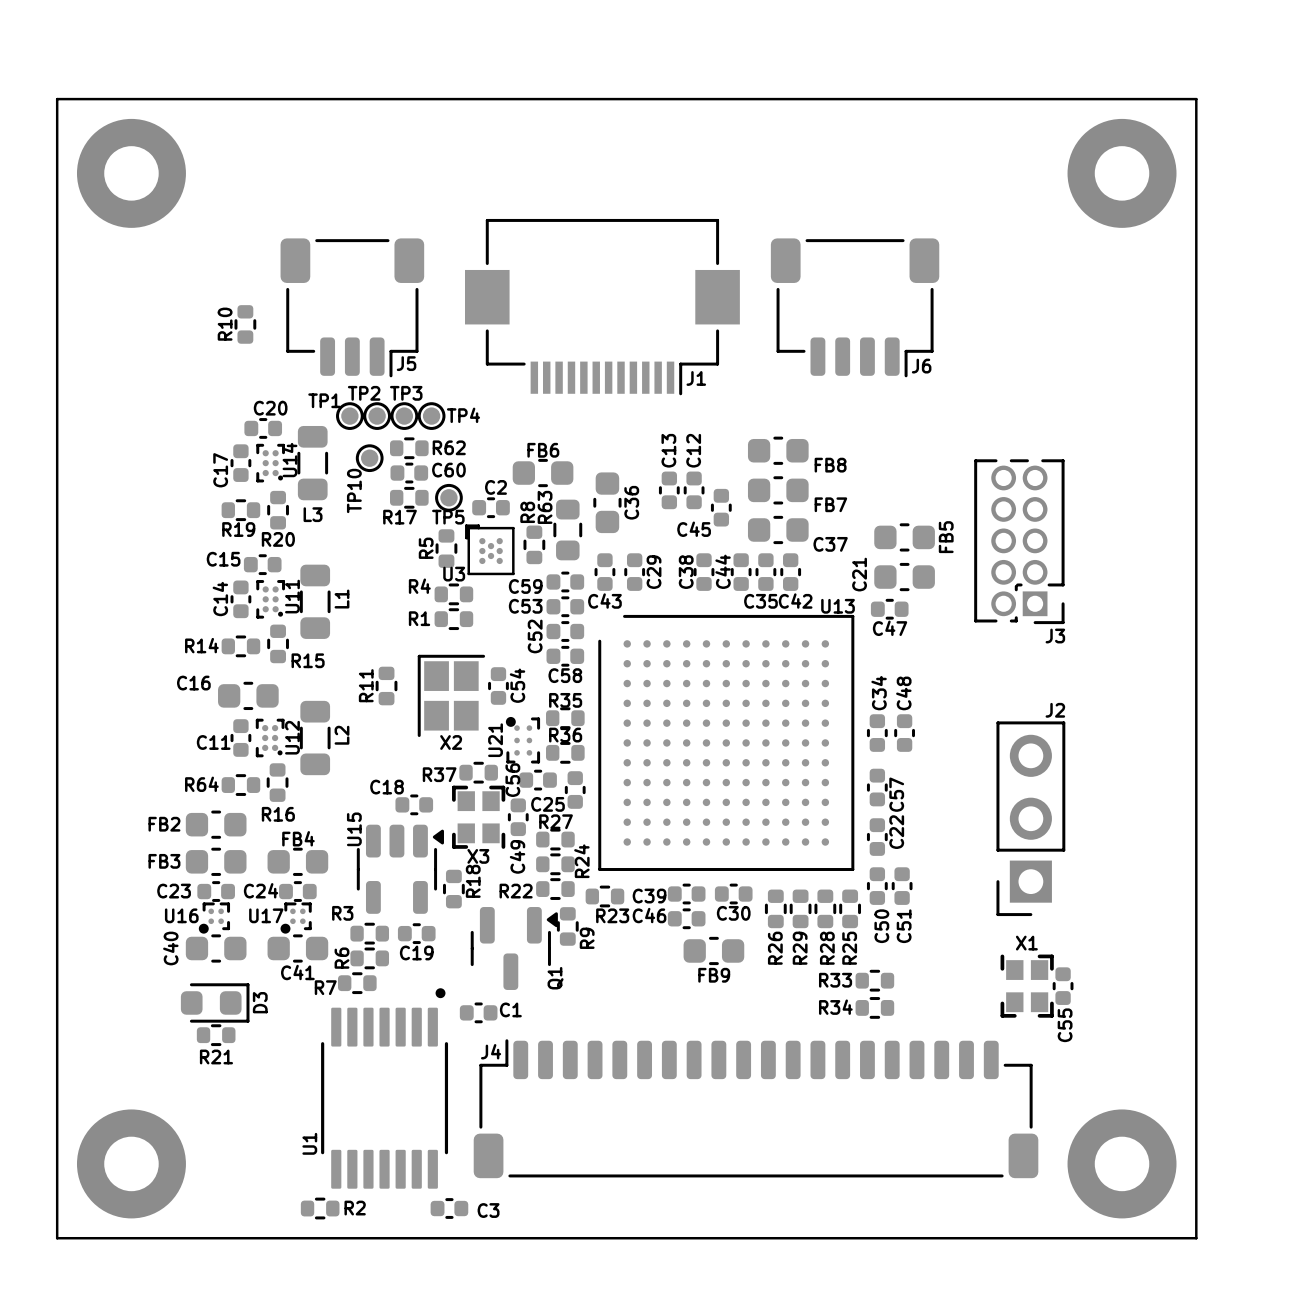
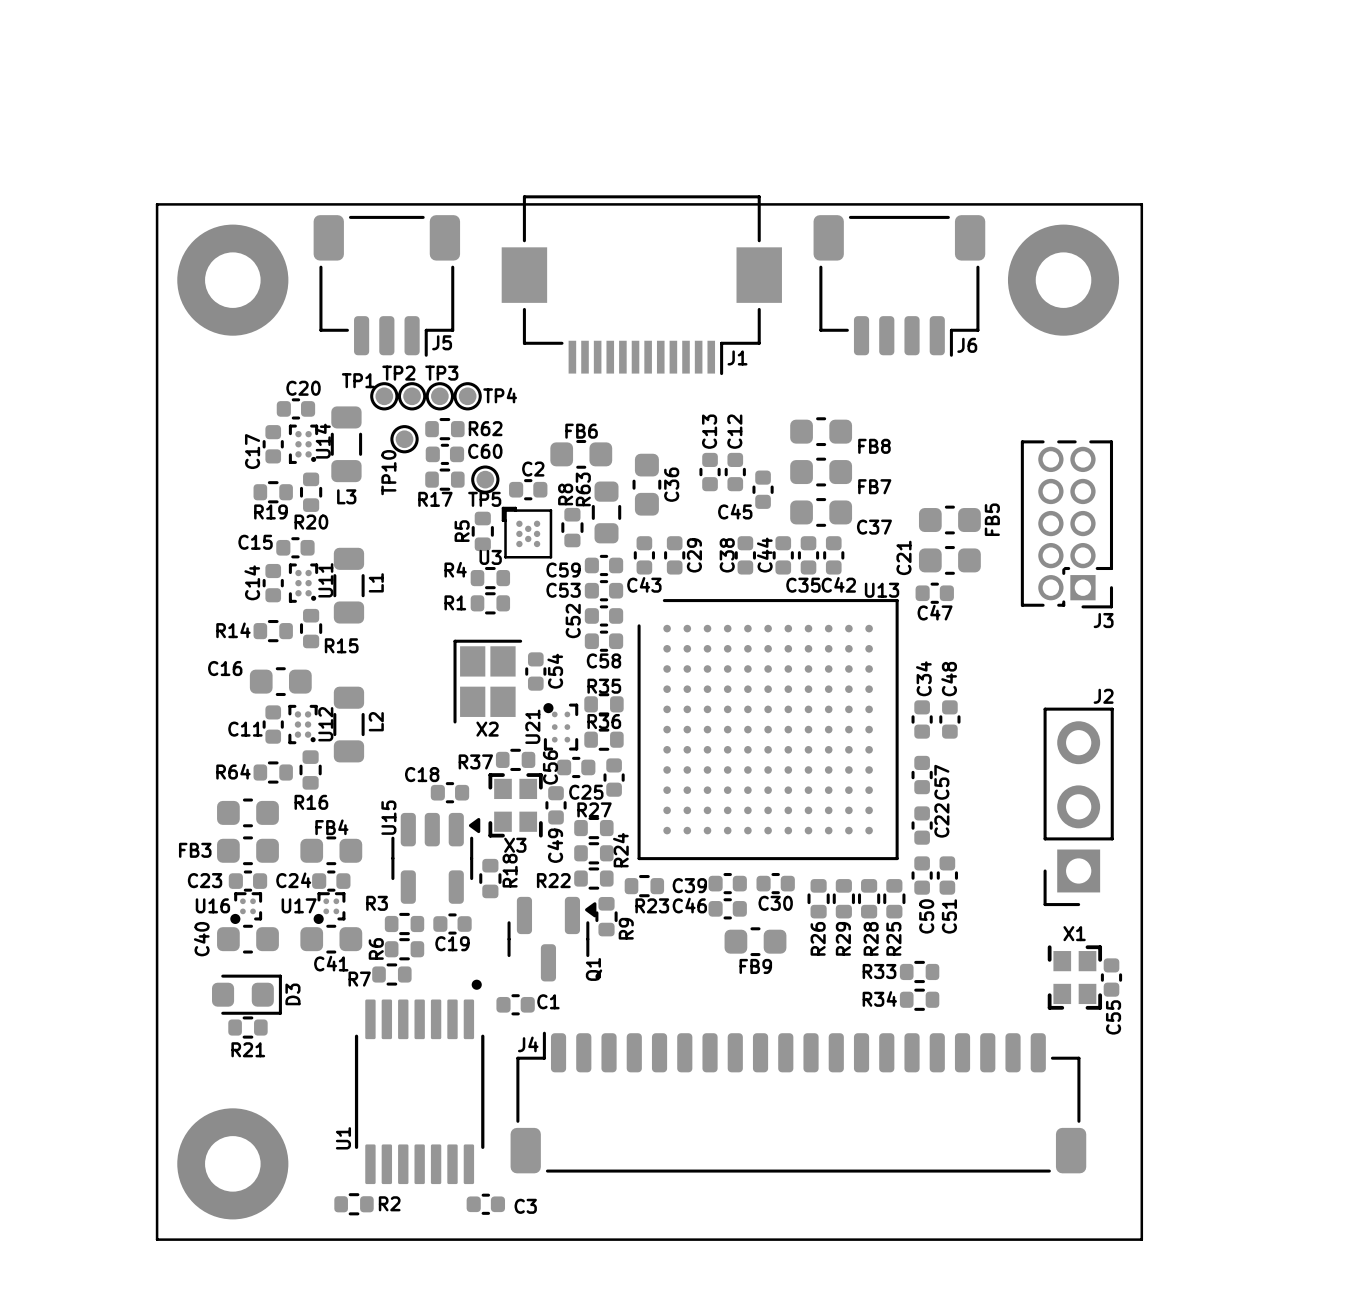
board edge: (57, 99) (1196, 99) (1196, 1238) (57, 1238) (57, 99) -> (157, 204) (157, 1239) (1141, 1239) (1141, 204) (157, 204)
part position: (131, 173) -> (232, 280)
part position: (1122, 173) -> (1063, 280)
R10: (245, 324) -> none
R11: (386, 686) -> none
FB2 name: FB2 (164, 824) -> none
part position: (131, 1163) -> (232, 1163)
part: (1122, 1163) -> none

